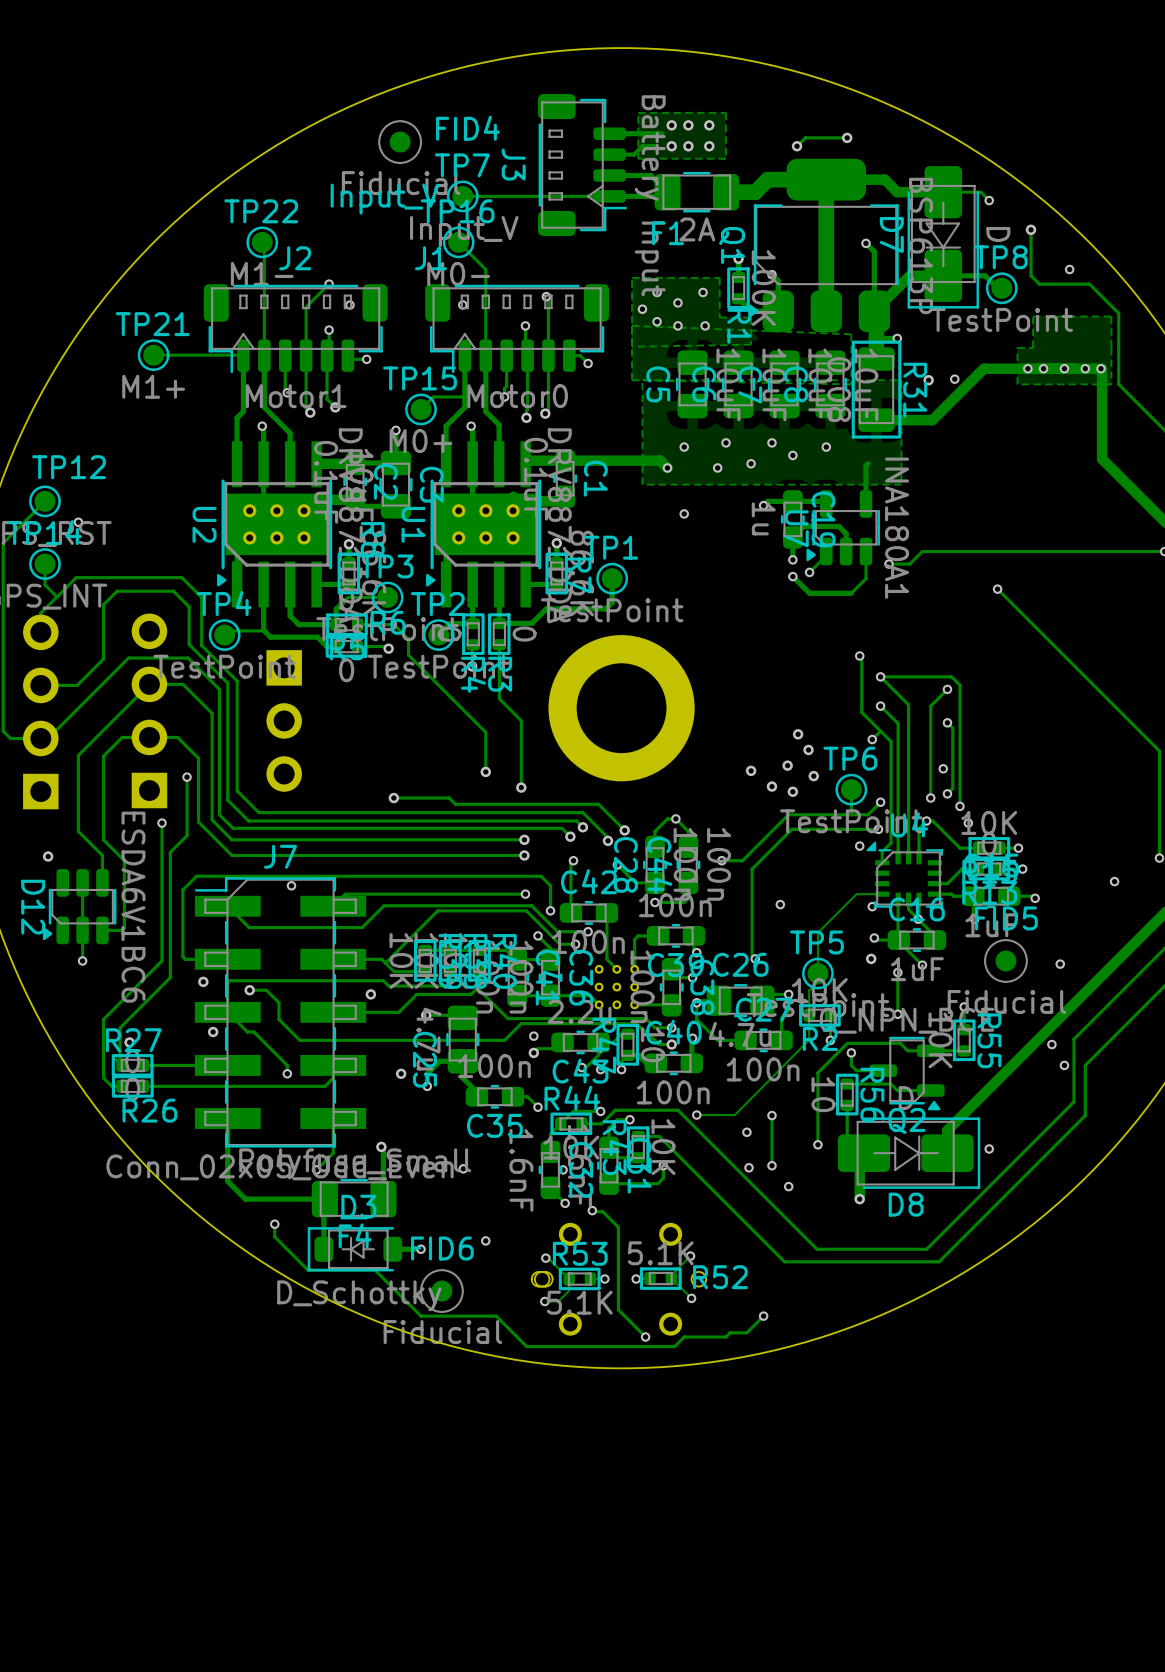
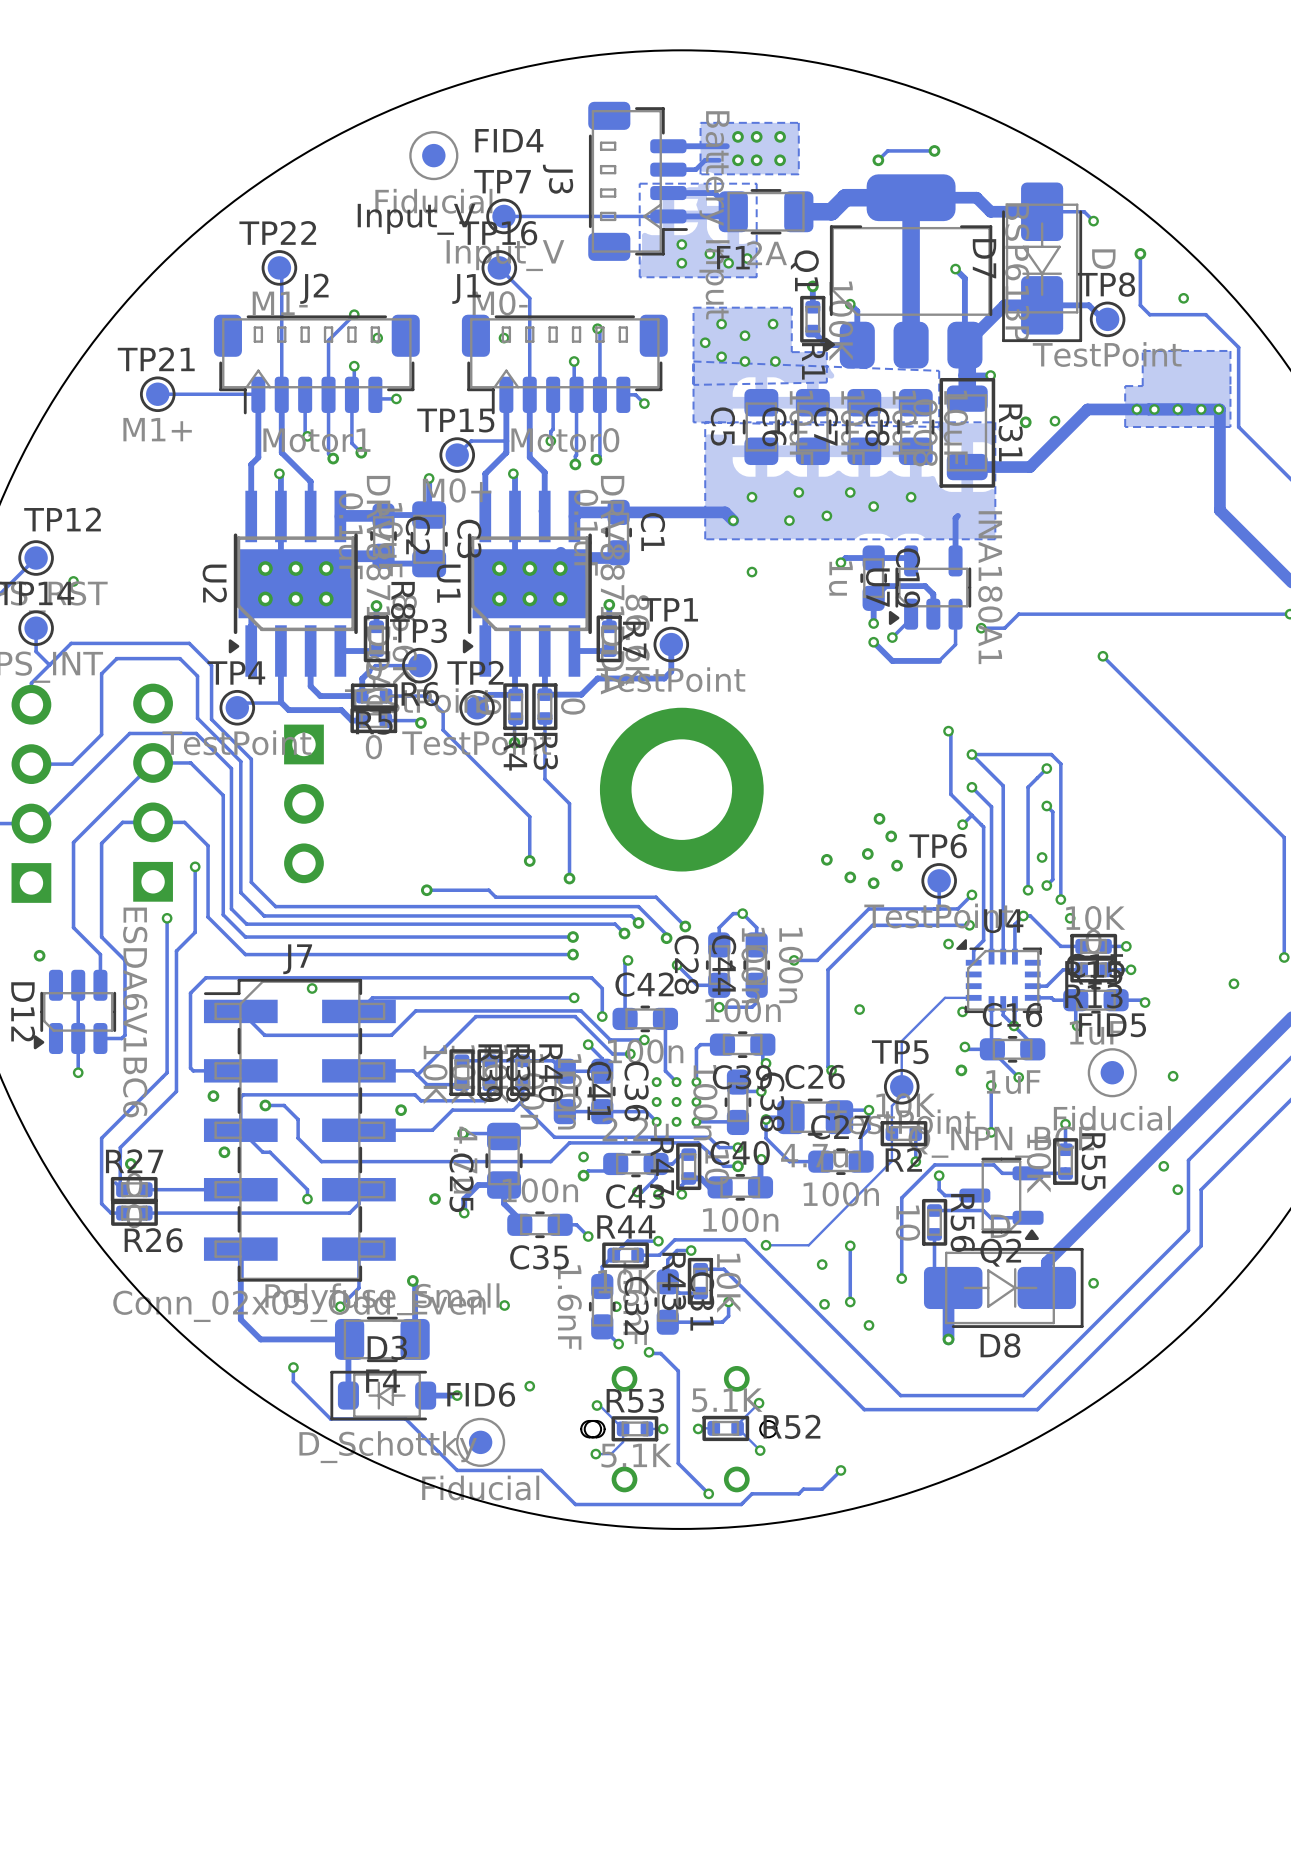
zone outline: none -> (756, 183) (756, 277) (639, 277) (639, 183) (756, 183)
via: none -> (681, 244)
via: none -> (709, 253)
via: none -> (747, 258)
via: none -> (681, 263)
via: none -> (728, 263)

